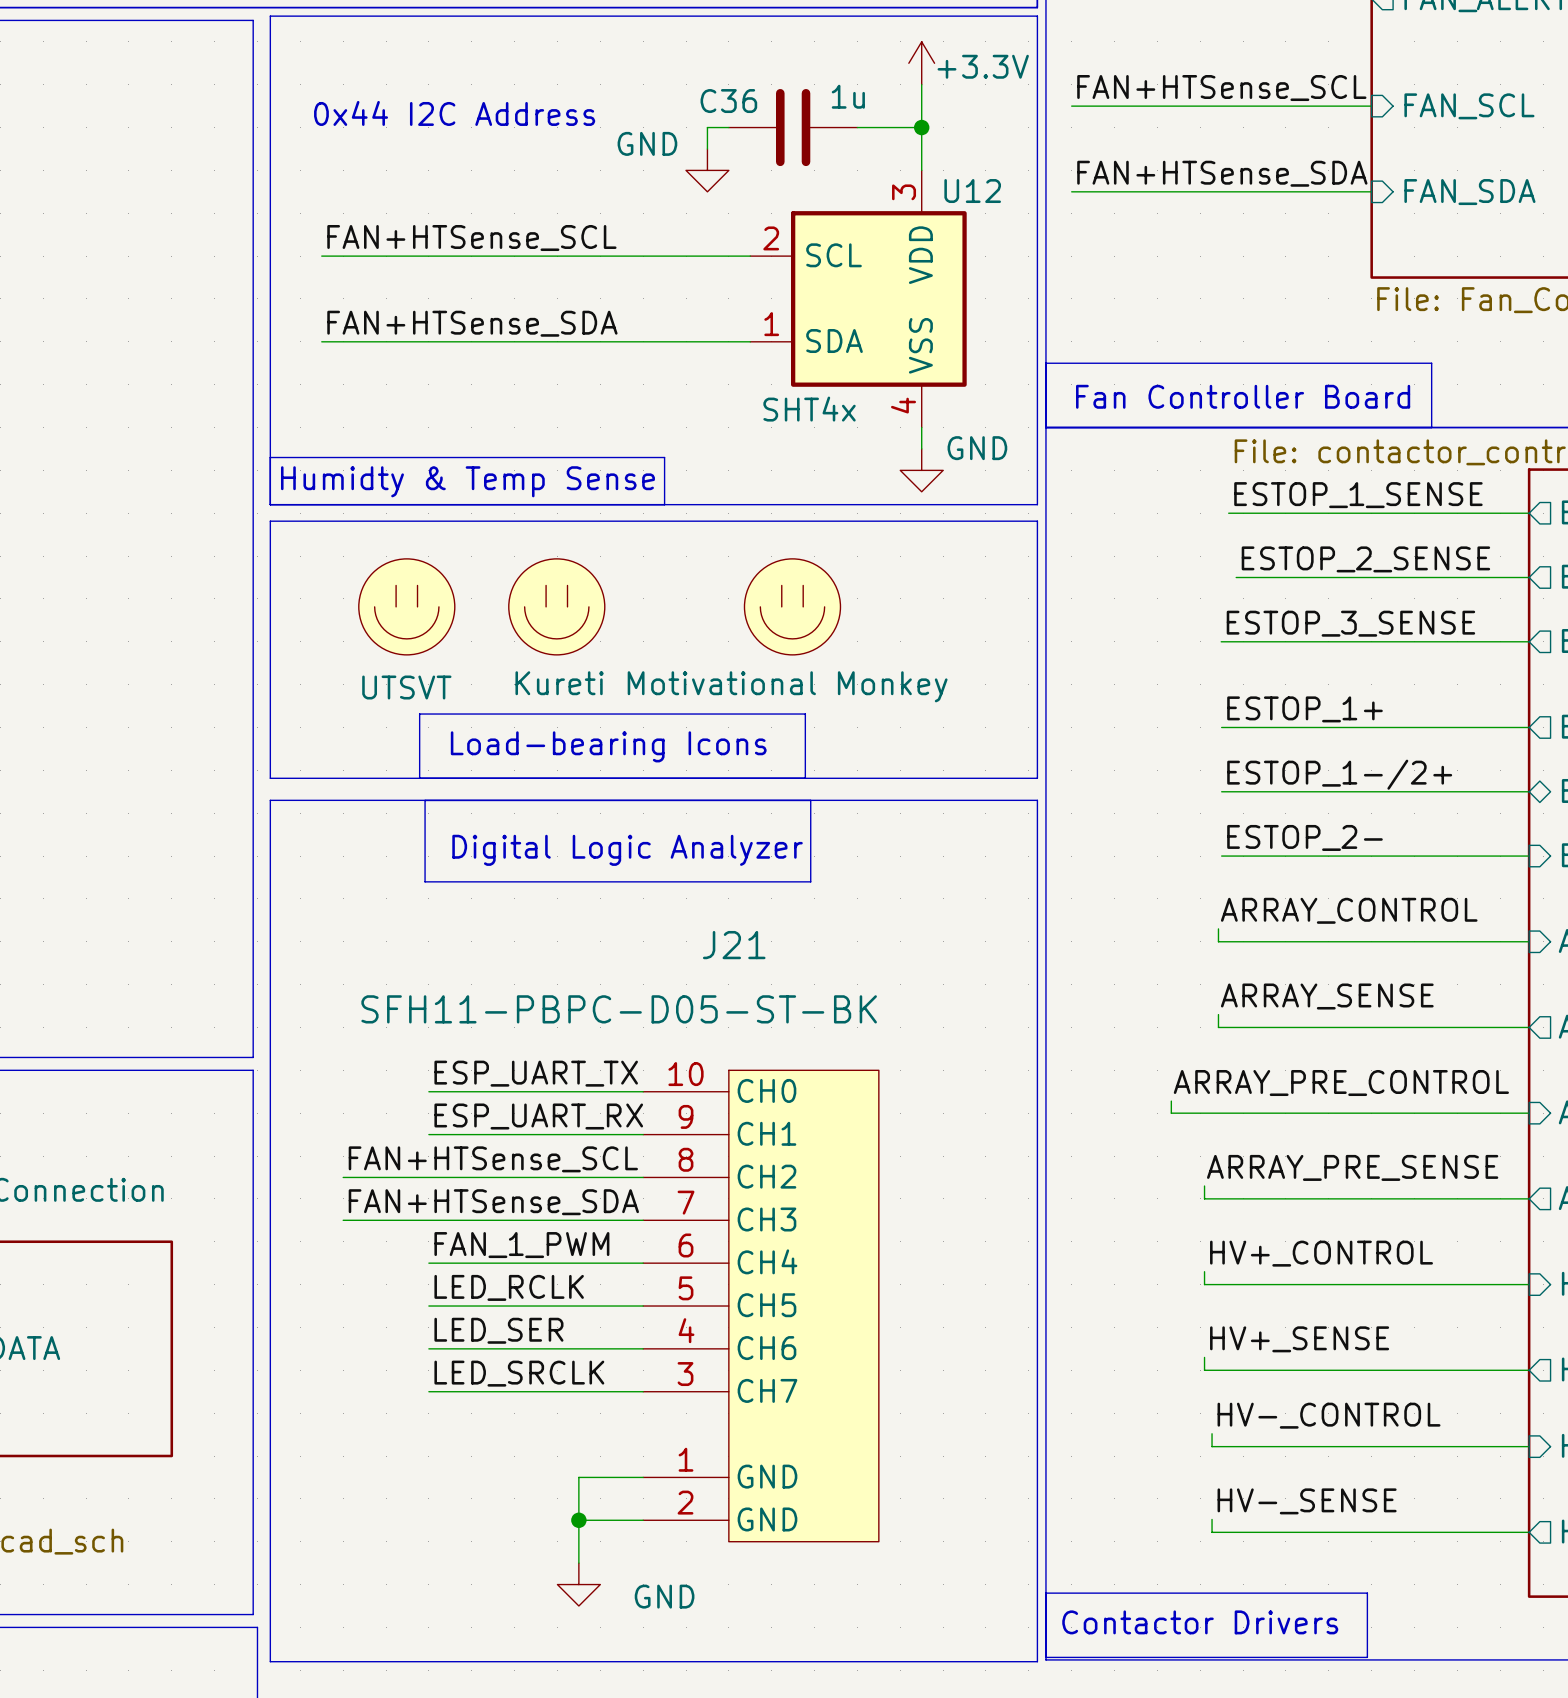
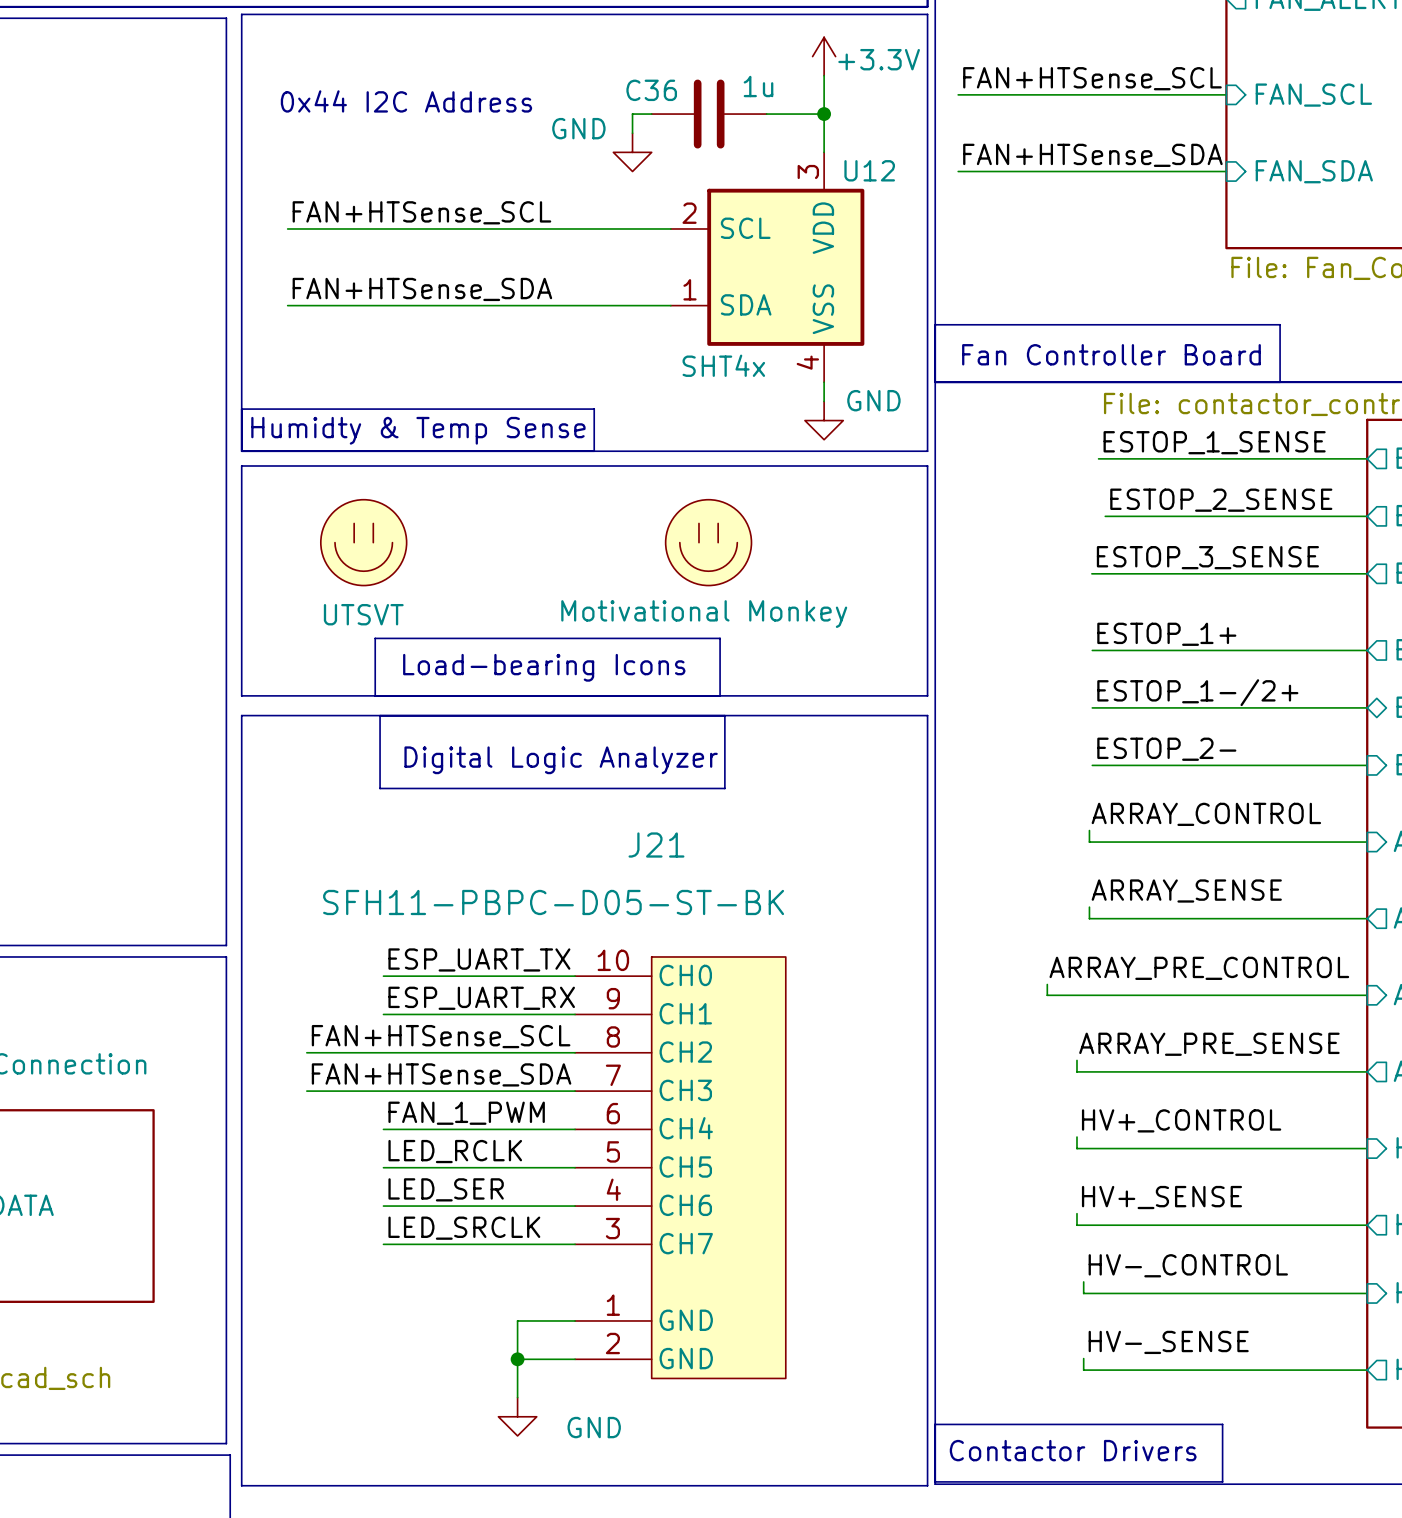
part: Kureti (556, 606) -> none

